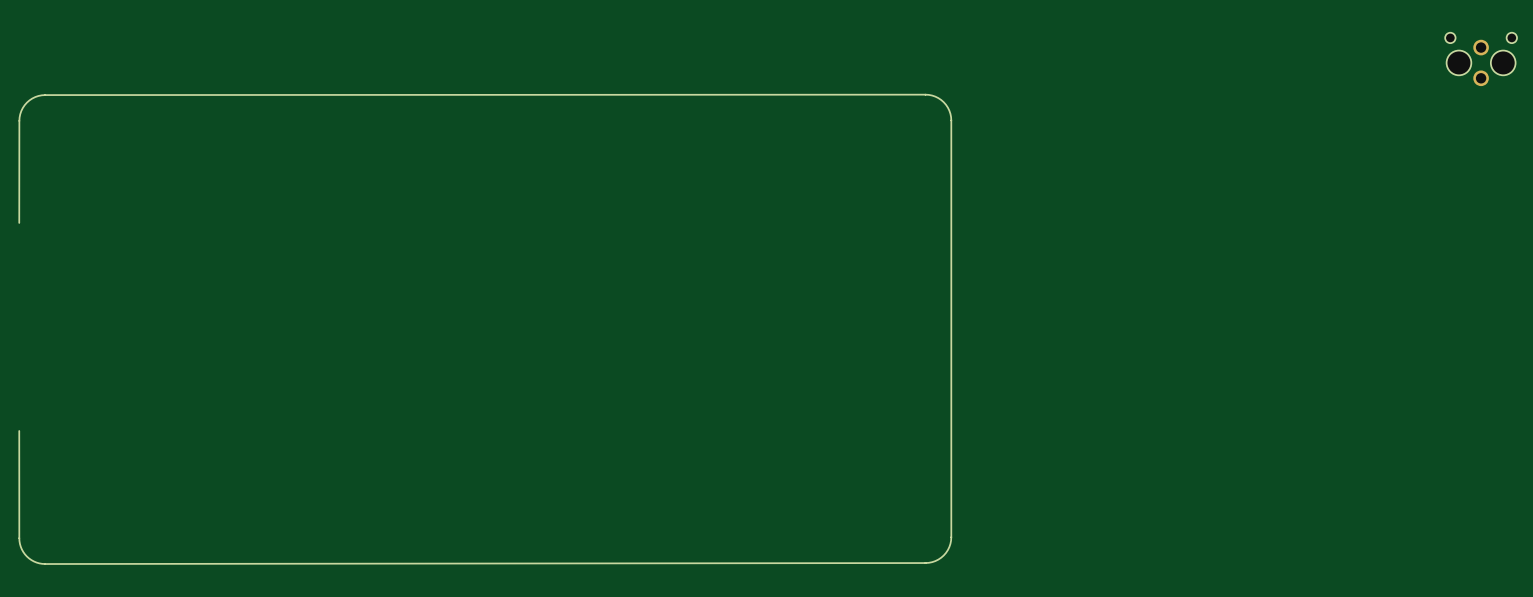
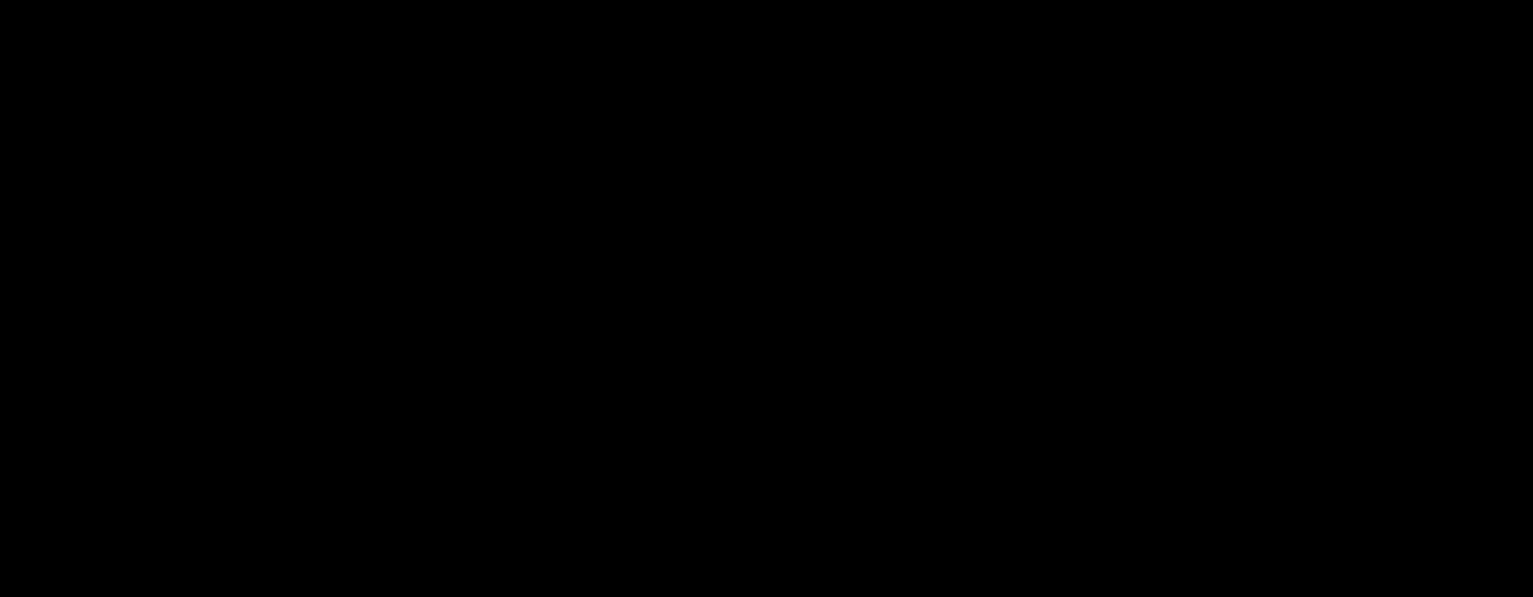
part: (1481, 59) -> none
board edge: (19, 222) (19, 117) (26, 102) (41, 95) (925, 94) (935, 96) (947, 107) (951, 120) (951, 540) (943, 555) (935, 561) (925, 563) (42, 563) (26, 556) (19, 543) (19, 430) -> none

